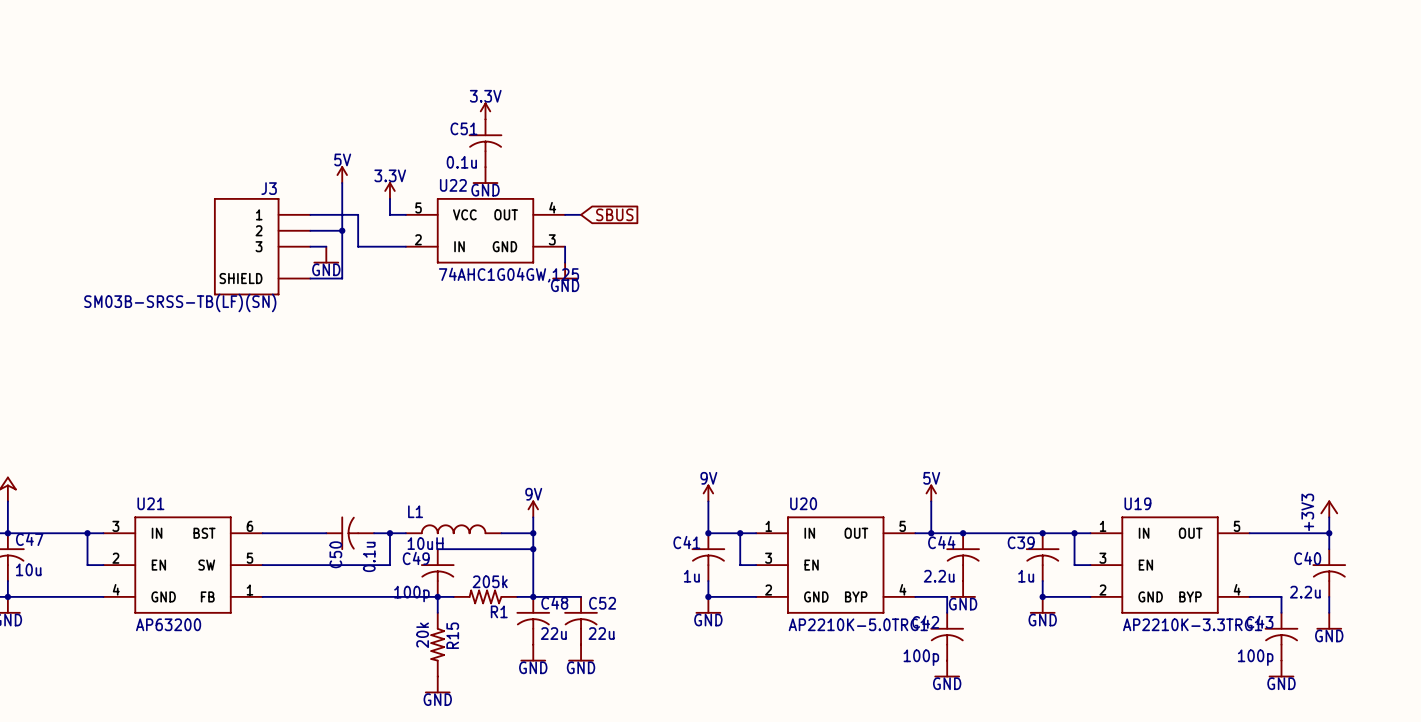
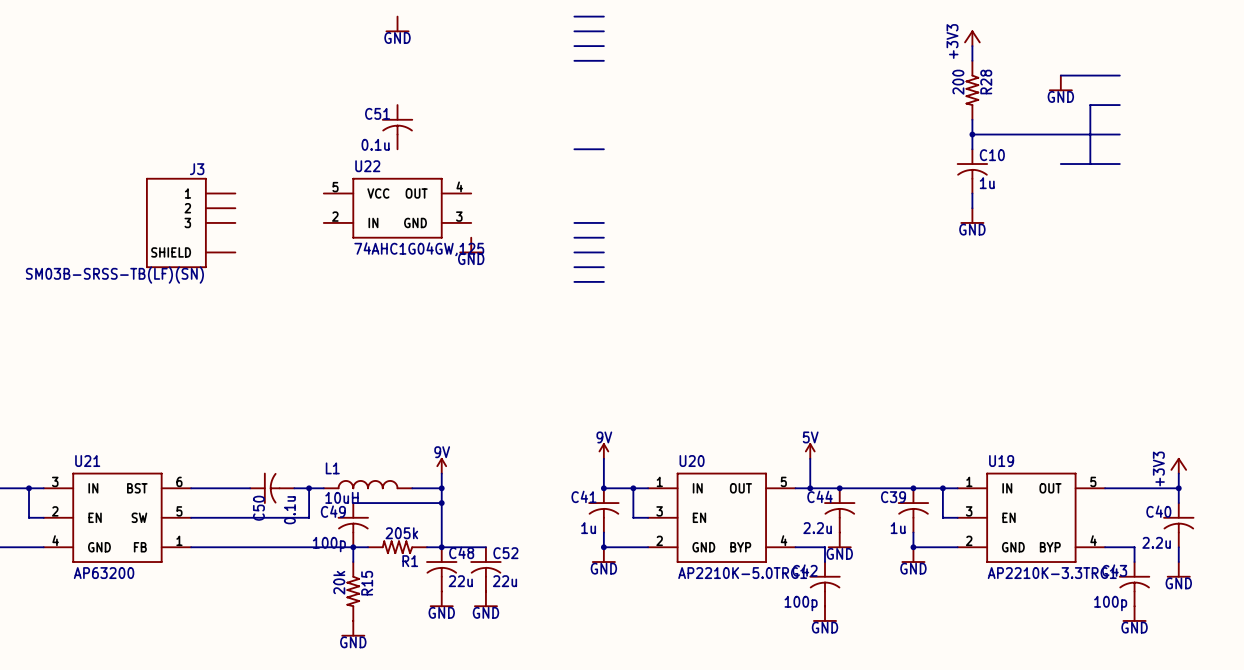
wire: none -> (574, 16) (603, 16)
power symbol: none -> GND (397, 24)
wire: none -> (574, 31) (603, 31)
power symbol: none -> +3V3 (972, 38)
wire: none -> (574, 46) (603, 46)
wire: none -> (972, 46) (972, 60)
wire: none -> (574, 60) (603, 60)
wire: none -> (1060, 75) (1119, 75)
power symbol: none -> GND (1060, 83)
R28: none -> 200 (972, 90)
power symbol: 3.3V (485, 110) -> none
wire: none -> (1119, 105) (1090, 105) (1090, 164)
wire: none -> (972, 119) (972, 149)
wire: none -> (972, 134) (1119, 134)
junction: none -> (972, 134)
wire: none -> (574, 149) (603, 149)
power symbol: 5V (342, 174) -> none
power symbol: GND (485, 175) -> none
wire: (342, 183) (342, 278) (310, 278) -> none
wire: none -> (1060, 164) (1119, 164)
power symbol: 3.3V (389, 190) -> none
C10: none -> 1u (972, 171)
wire: (389, 198) (389, 214) (405, 214) -> none
wire: (310, 214) (358, 214) (358, 246) (405, 246) -> none
wire: (565, 214) (581, 214) -> none
global label: SBUS (614, 214) -> none
wire: none -> (972, 193) (972, 208)
wire: (310, 230) (342, 230) -> none
junction: (342, 230) -> none
power symbol: none -> GND (972, 215)
wire: (310, 246) (326, 246) -> none
wire: (565, 246) (565, 262) -> none
wire: none -> (574, 222) (603, 222)
power symbol: GND (326, 255) -> none
wire: none -> (574, 237) (603, 237)
wire: none -> (574, 252) (603, 252)
wire: none -> (574, 267) (603, 267)
wire: none -> (574, 281) (603, 281)

